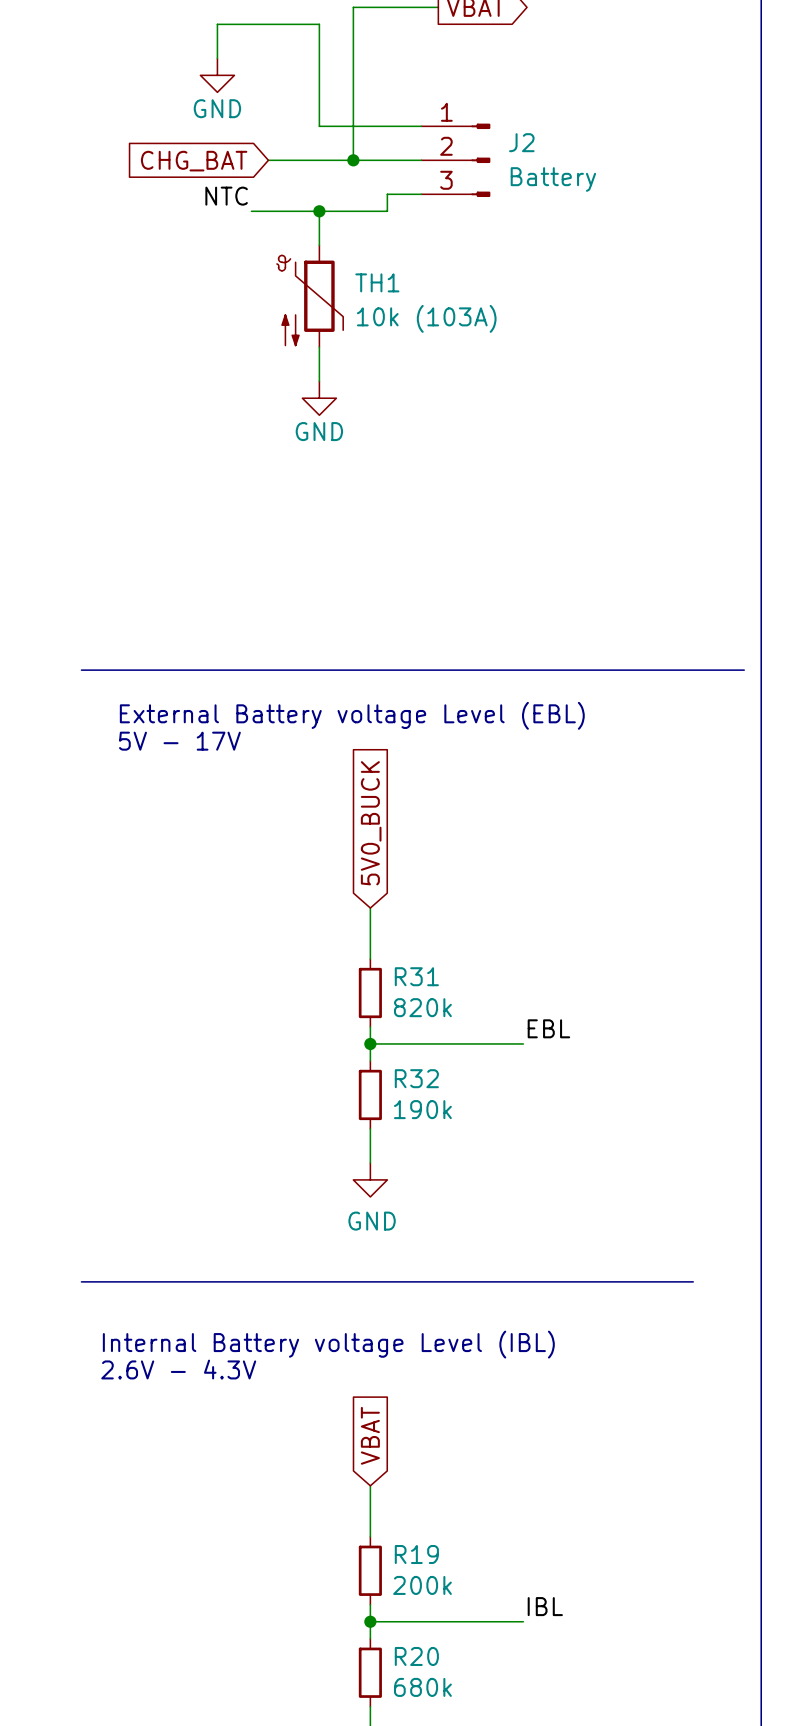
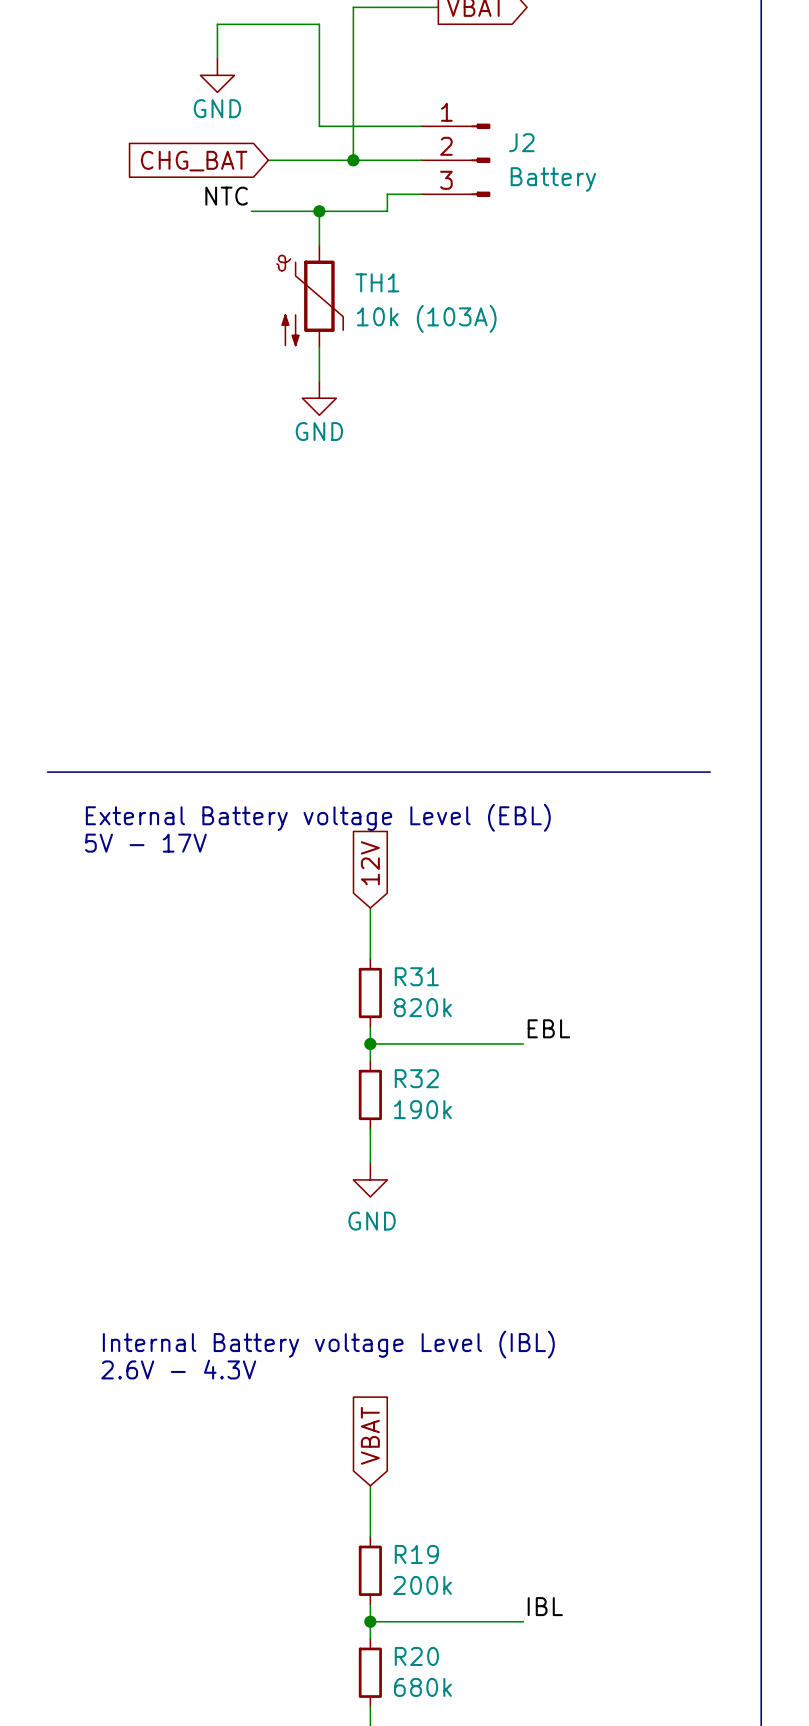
line: (81, 670) (744, 670) -> (47, 772) (710, 772)
text position: External Battery voltage Level (EBL) (352, 715) -> External Battery voltage Level (EBL) (318, 817)
text position: 5V - 17V (179, 741) -> 5V - 17V (145, 843)
global label: 5V0_BUCK (371, 823) -> 12V (370, 863)
line: (81, 1281) (693, 1281) -> none

